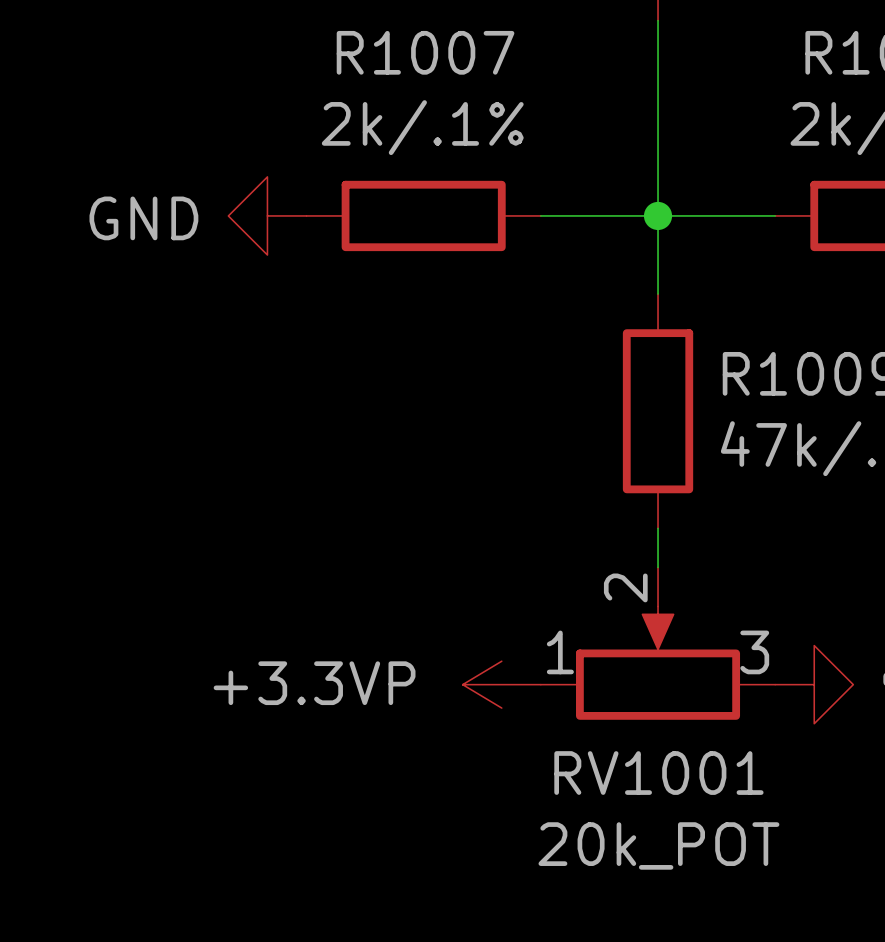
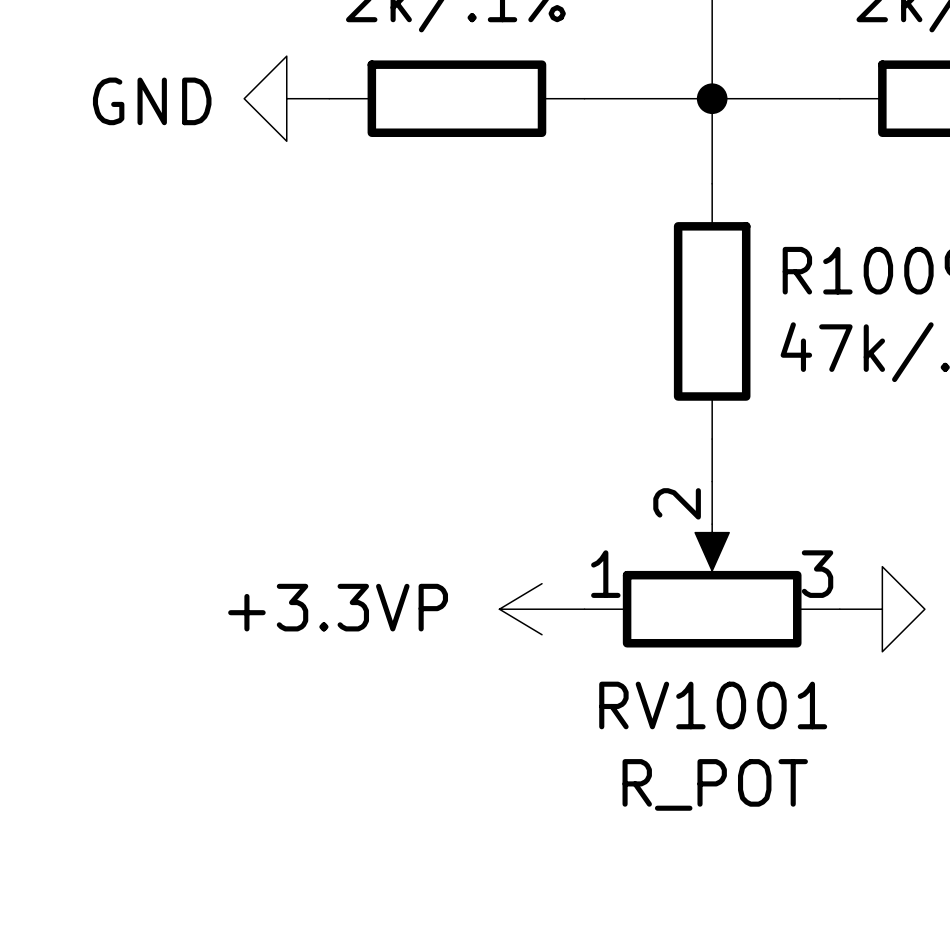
RV1001 value: 20k_POT (658, 845) -> R_POT (715, 784)

